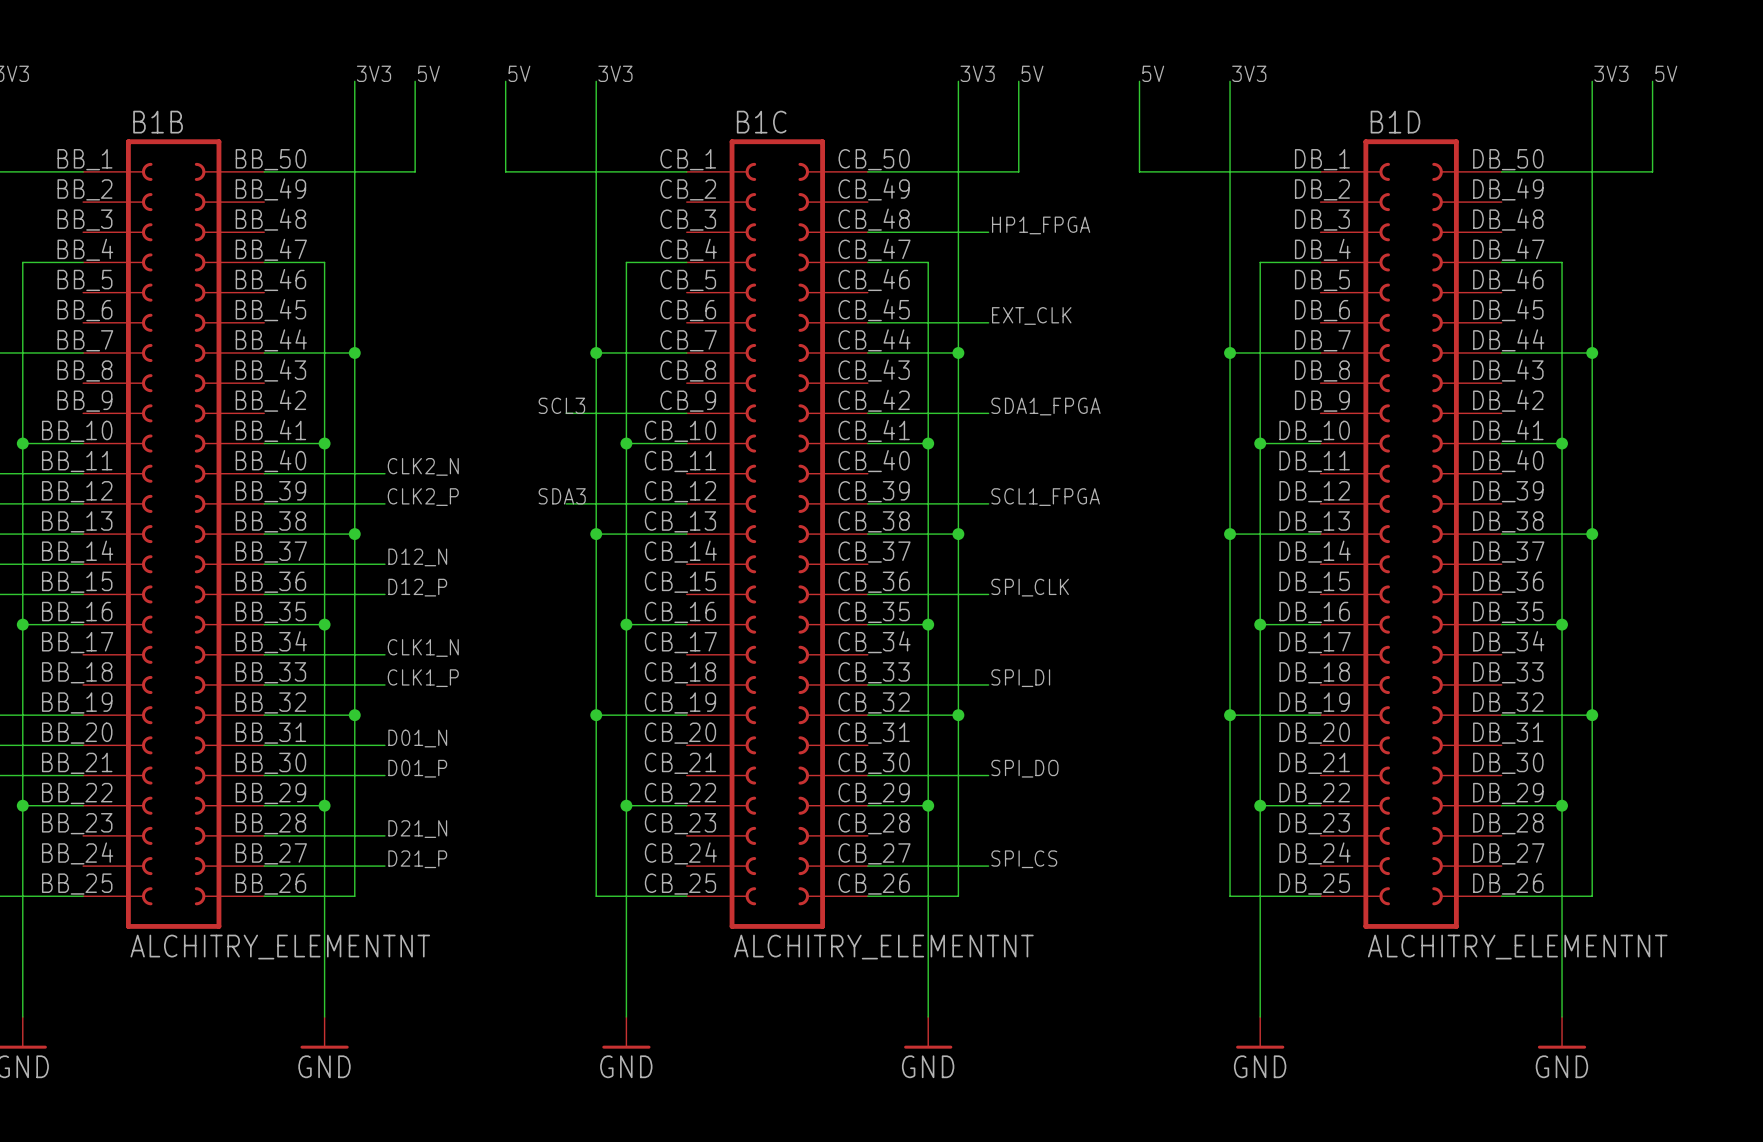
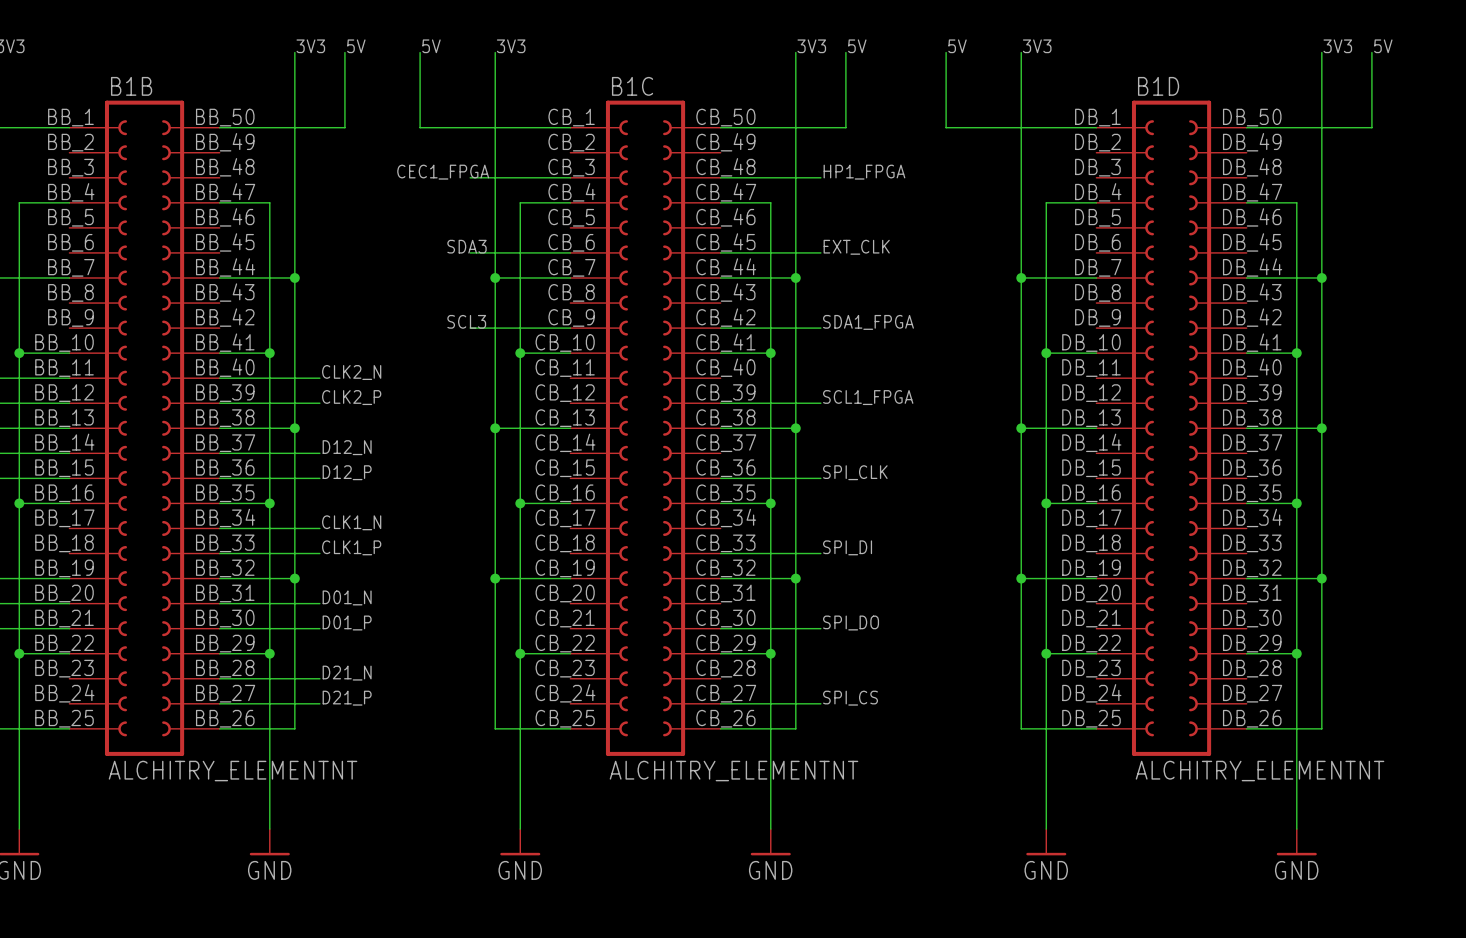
label: none -> CEC1_FPGA (443, 172)
wire: none -> (470, 177) (570, 177)
label position: SDA3 (562, 496) -> SDA3 (467, 246)
wire: (566, 503) (686, 503) -> (470, 252) (570, 252)

